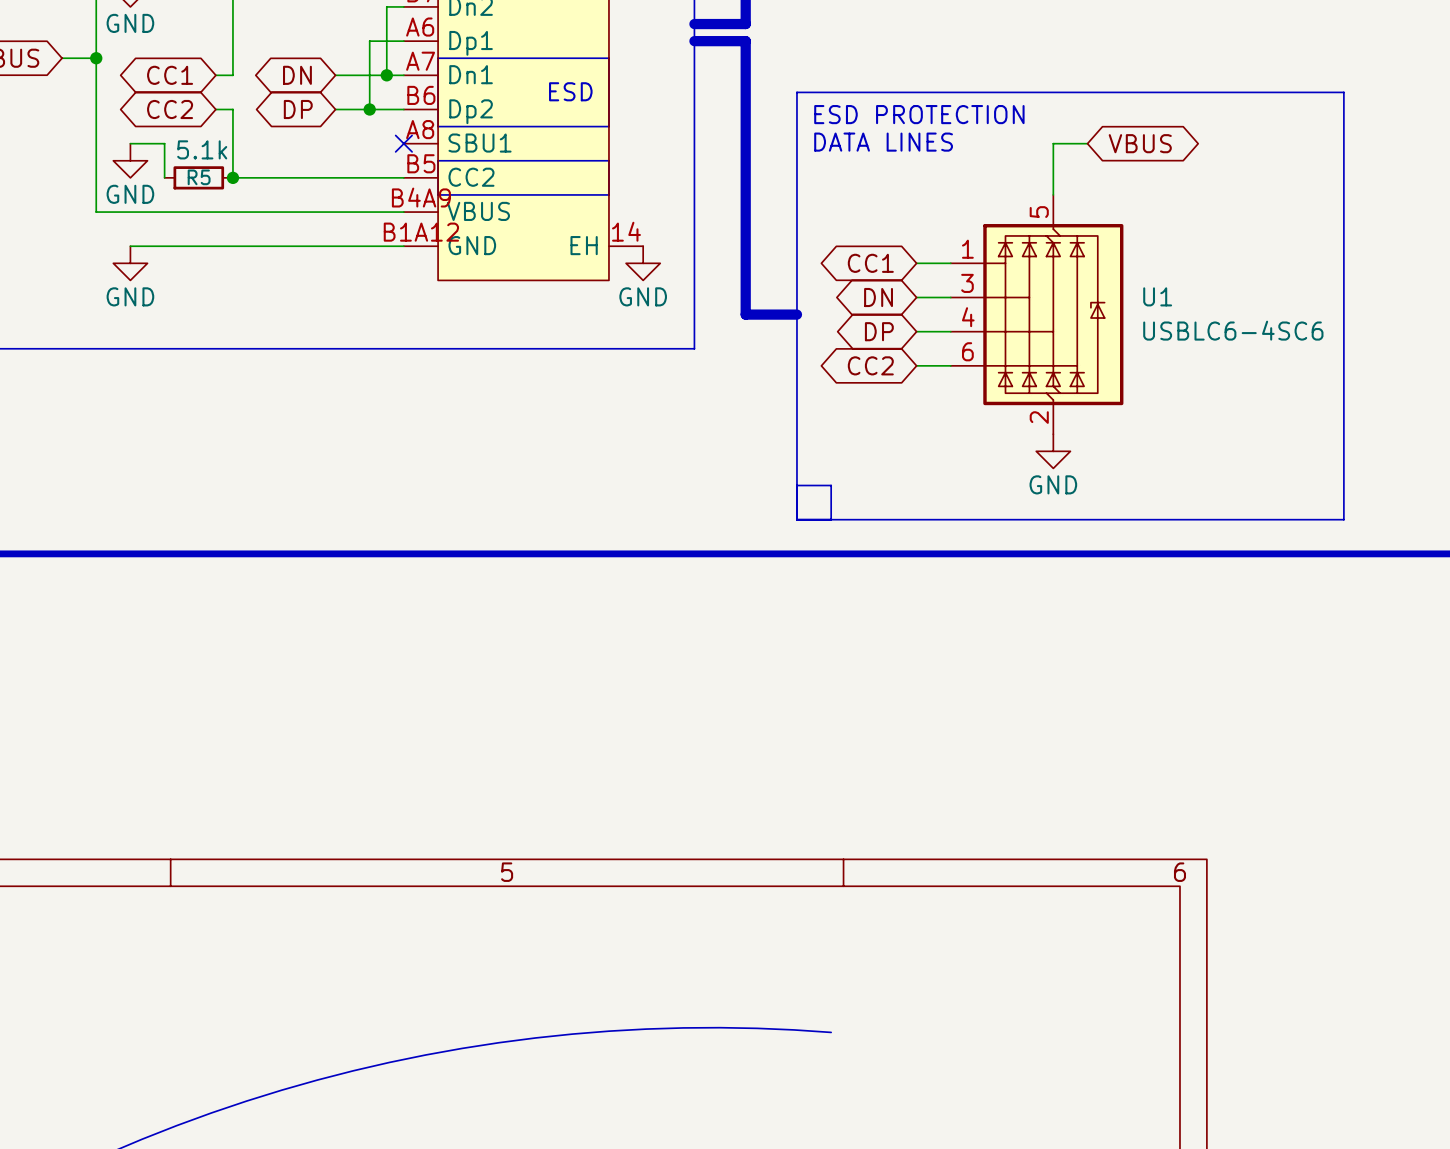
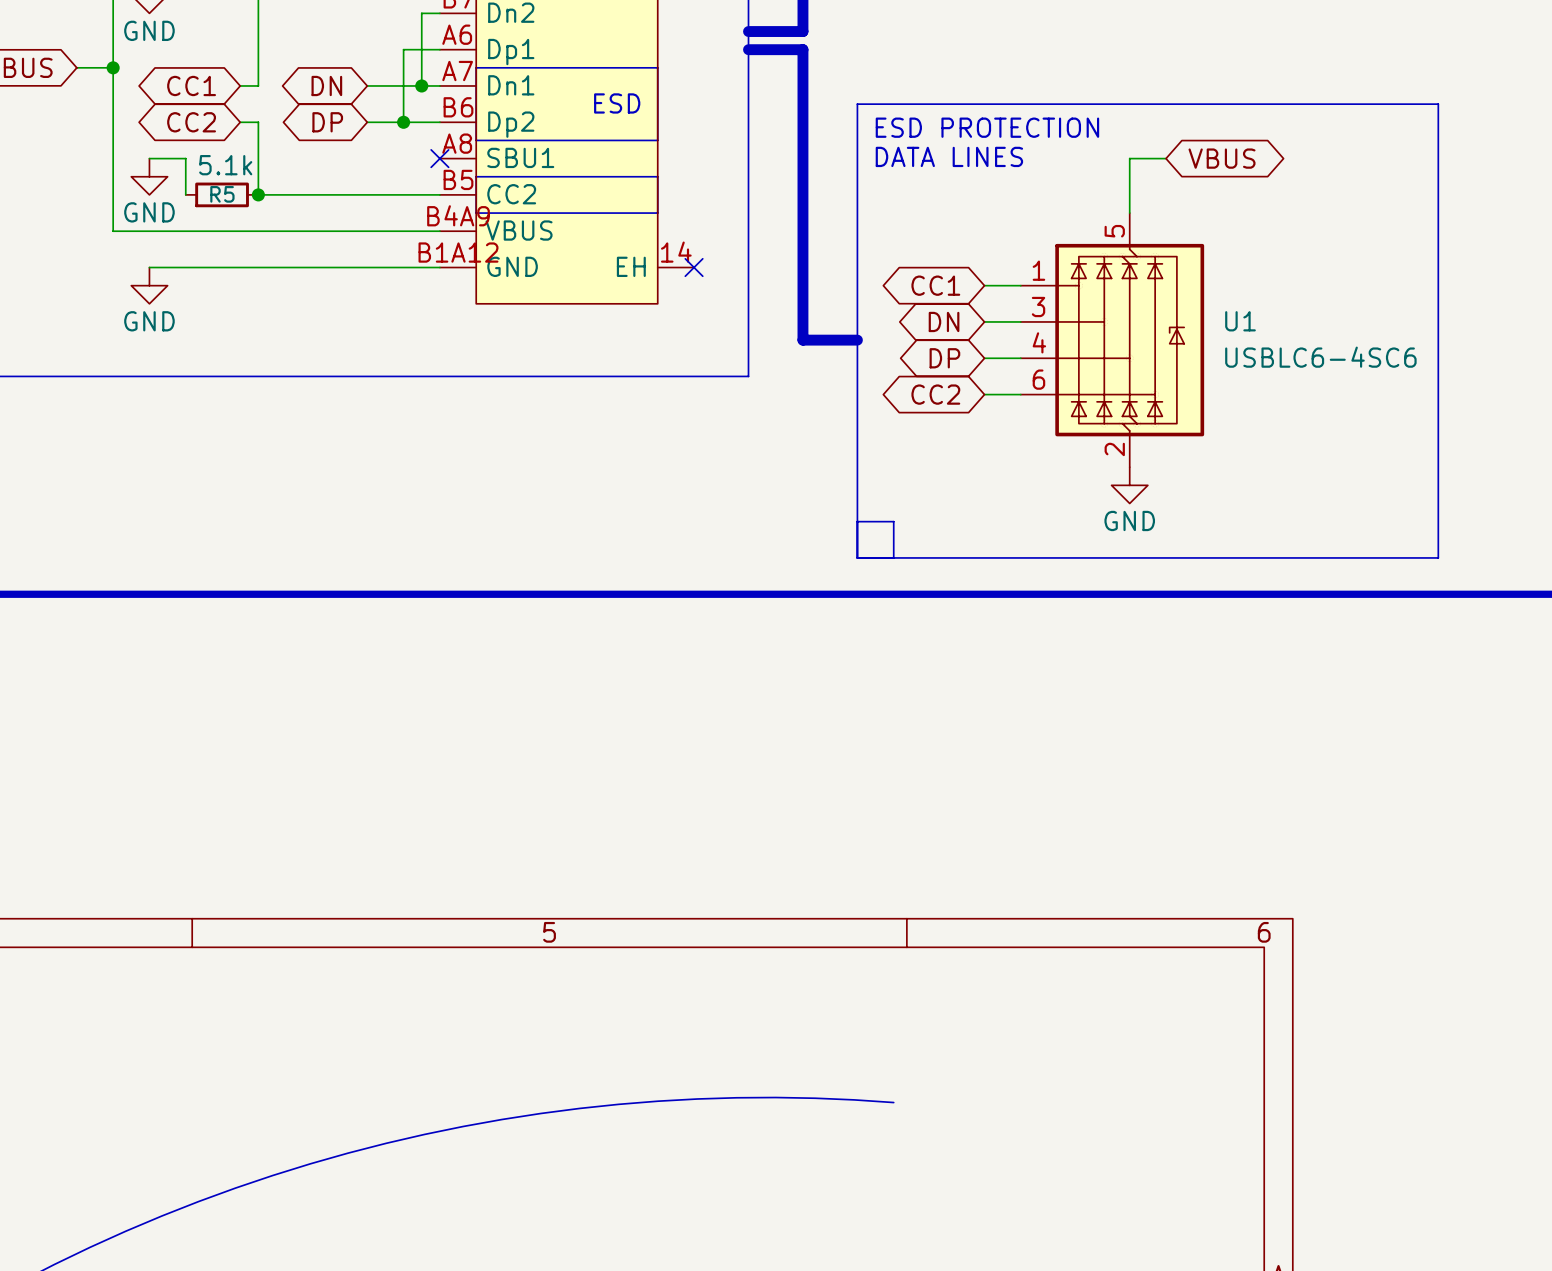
no-connect mark: none -> (694, 267)
power symbol: GND (643, 263) -> none

